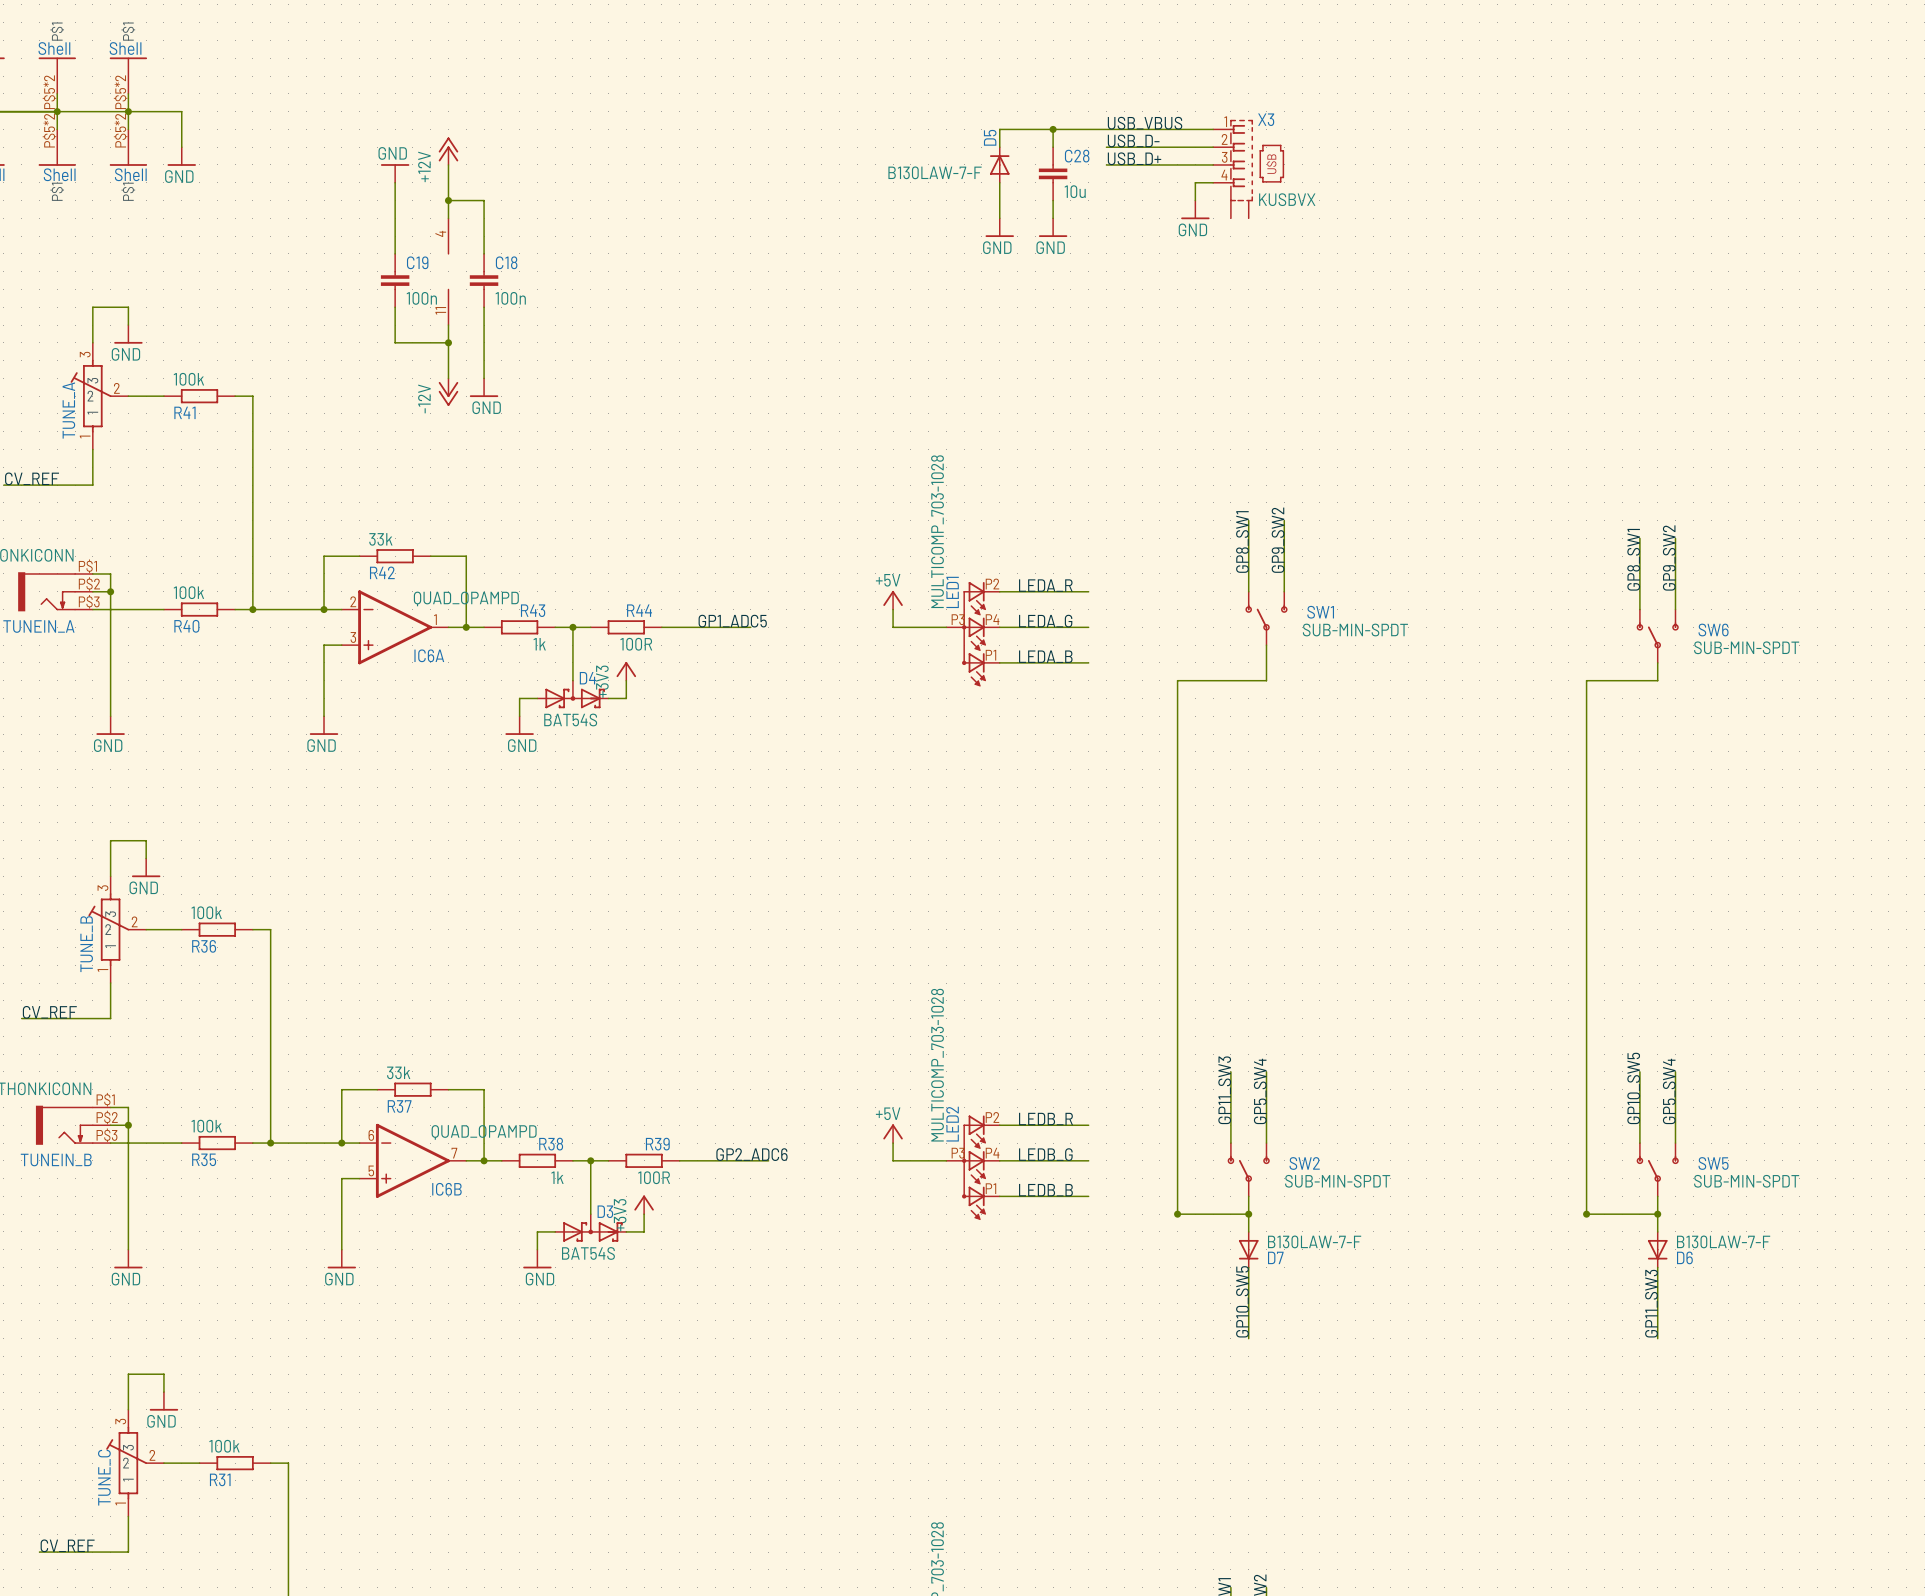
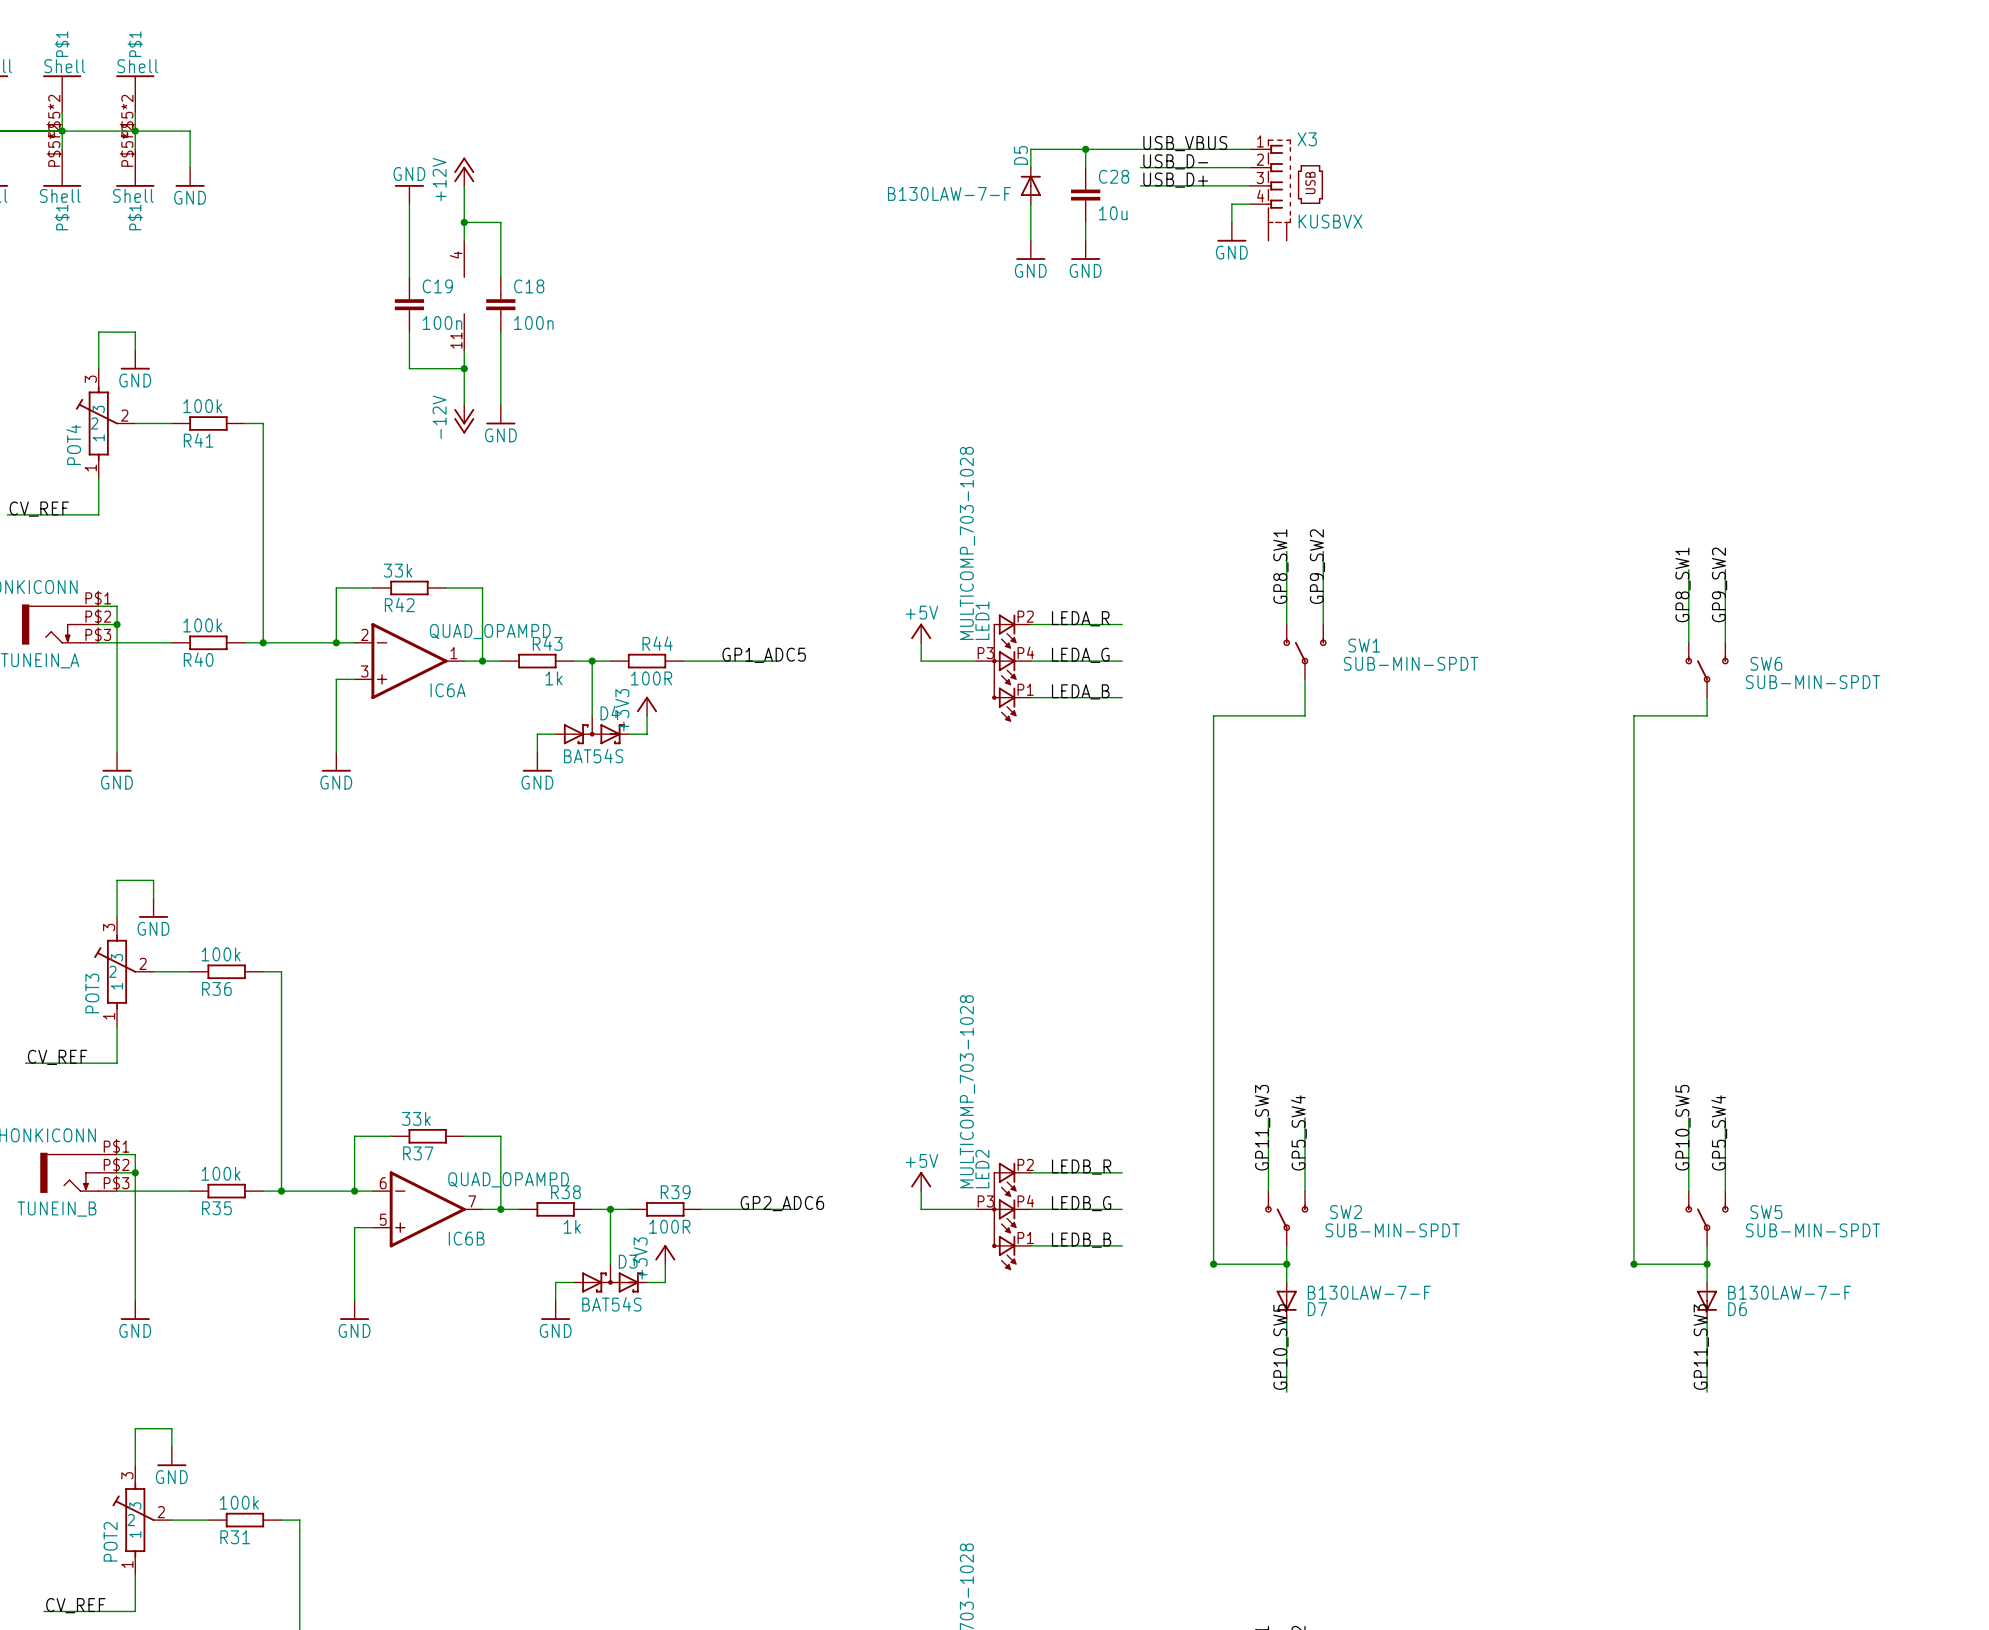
TUNE_A name: TUNE_A (68, 410) -> POT4 (73, 444)
TUNE_B name: TUNE_B (86, 944) -> POT3 (92, 993)
TUNE_C name: TUNE_C (104, 1477) -> POT2 (110, 1541)

